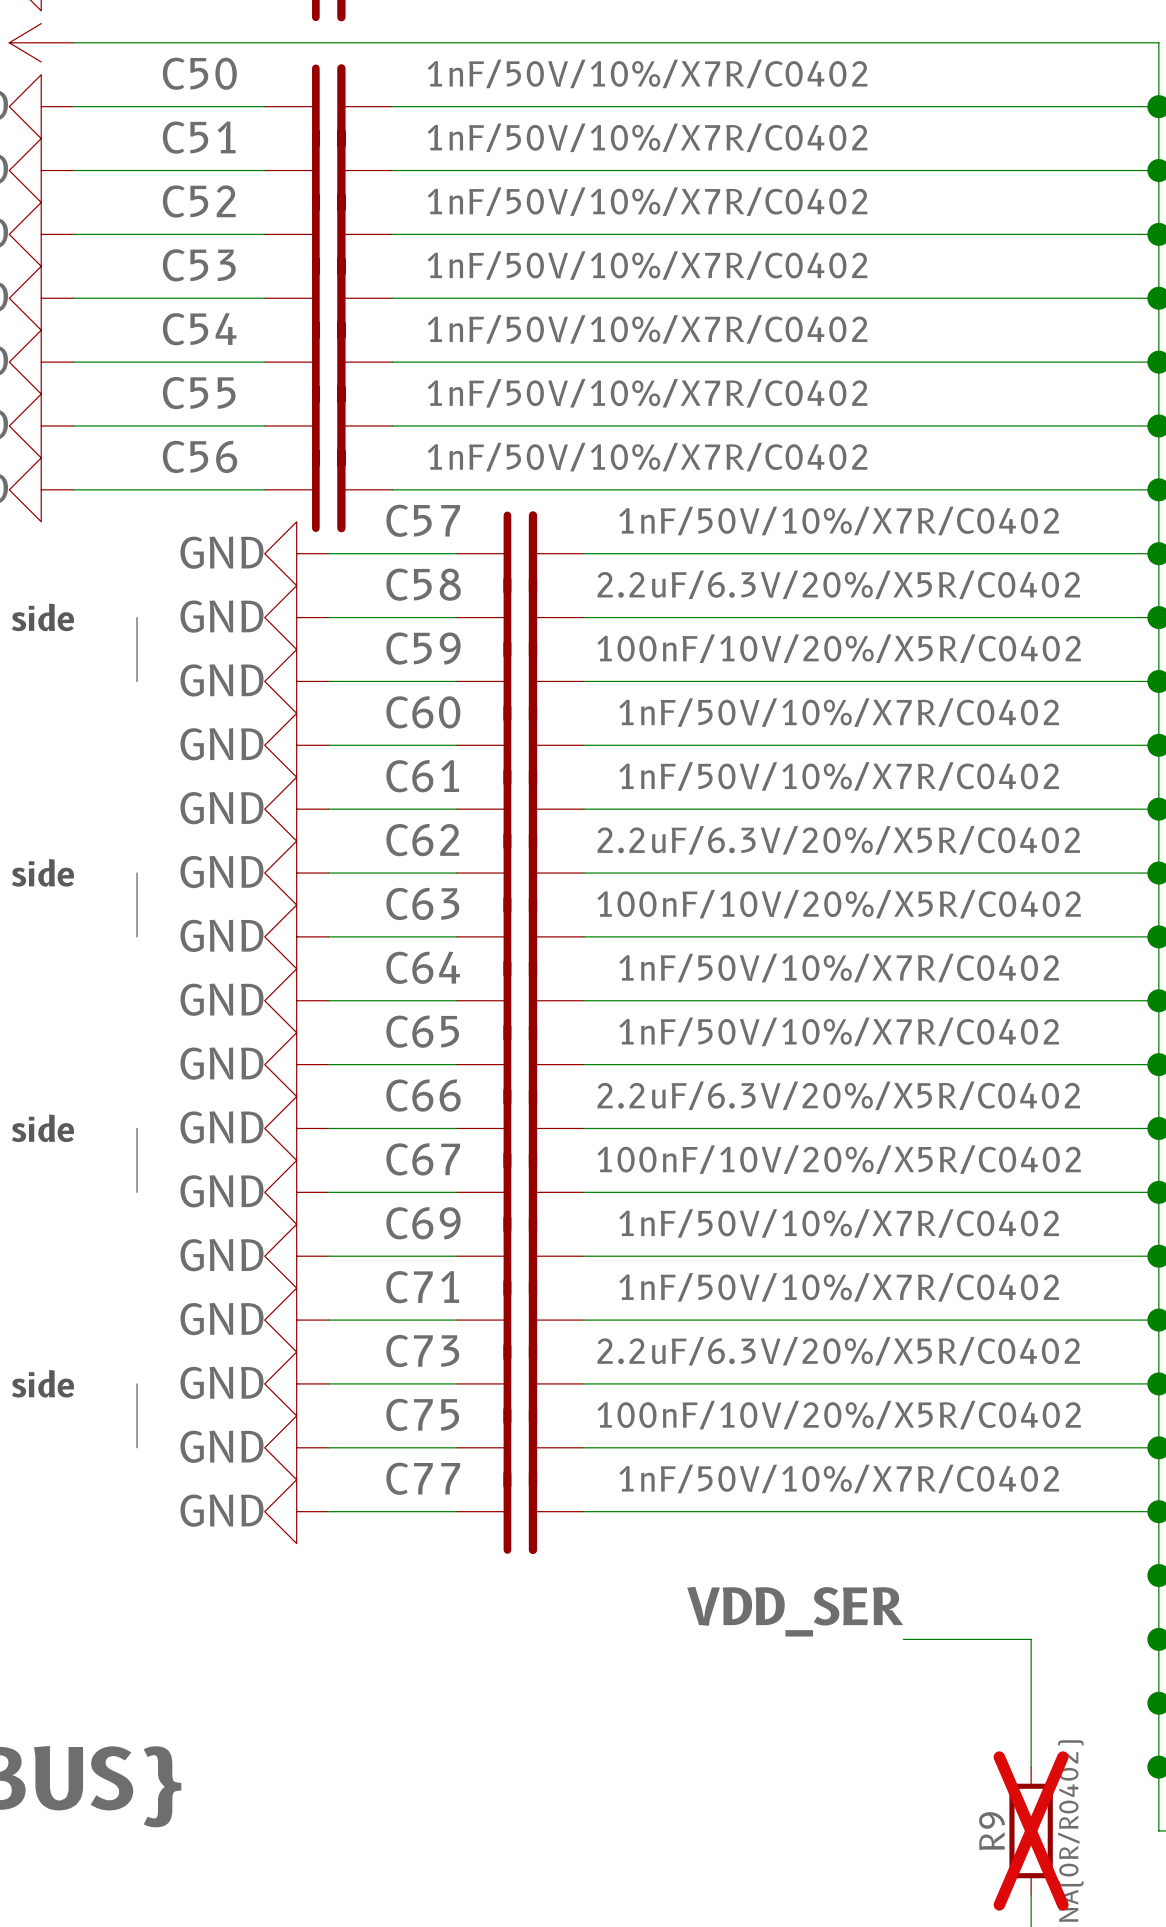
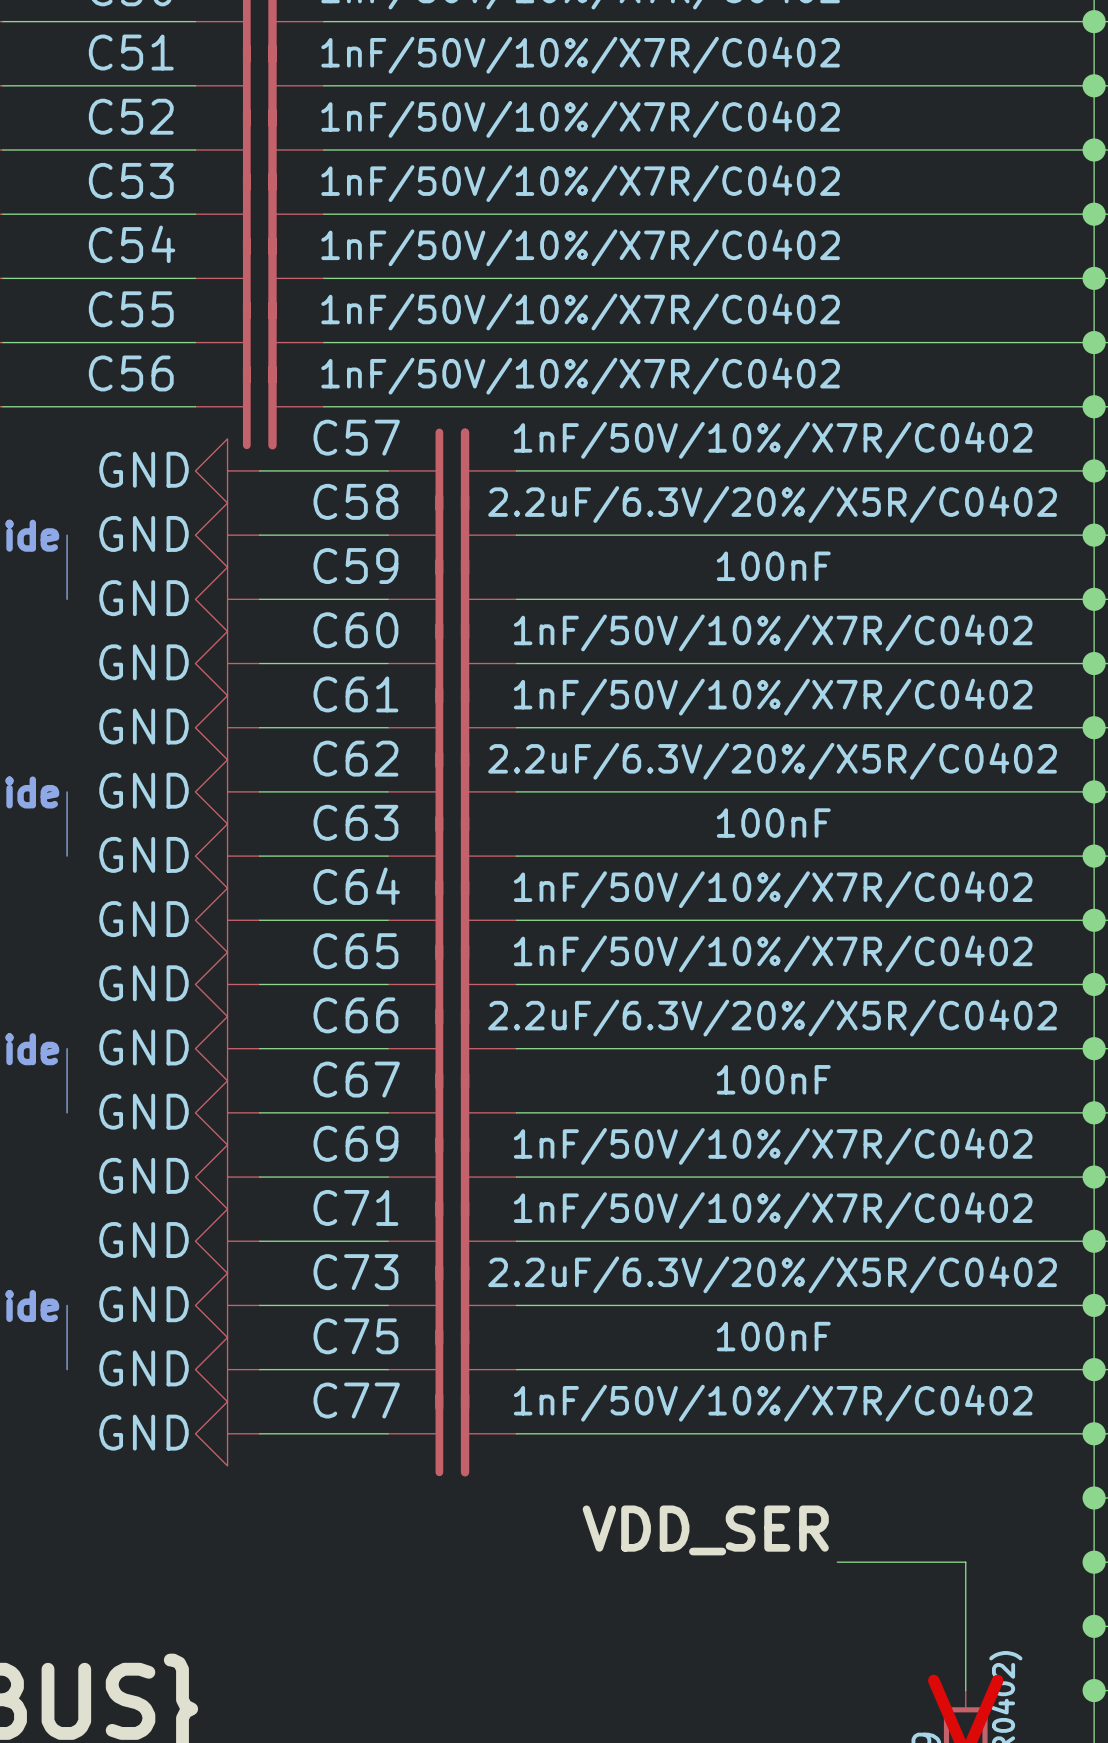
C59 value: 100nF/10V/20%/X5R/C0402 (839, 648) -> 100nF (773, 566)
C63 value: 100nF/10V/20%/X5R/C0402 (839, 904) -> 100nF (773, 823)
C67 value: 100nF/10V/20%/X5R/C0402 (839, 1159) -> 100nF (773, 1079)
C75 value: 100nF/10V/20%/X5R/C0402 (839, 1415) -> 100nF (773, 1336)

